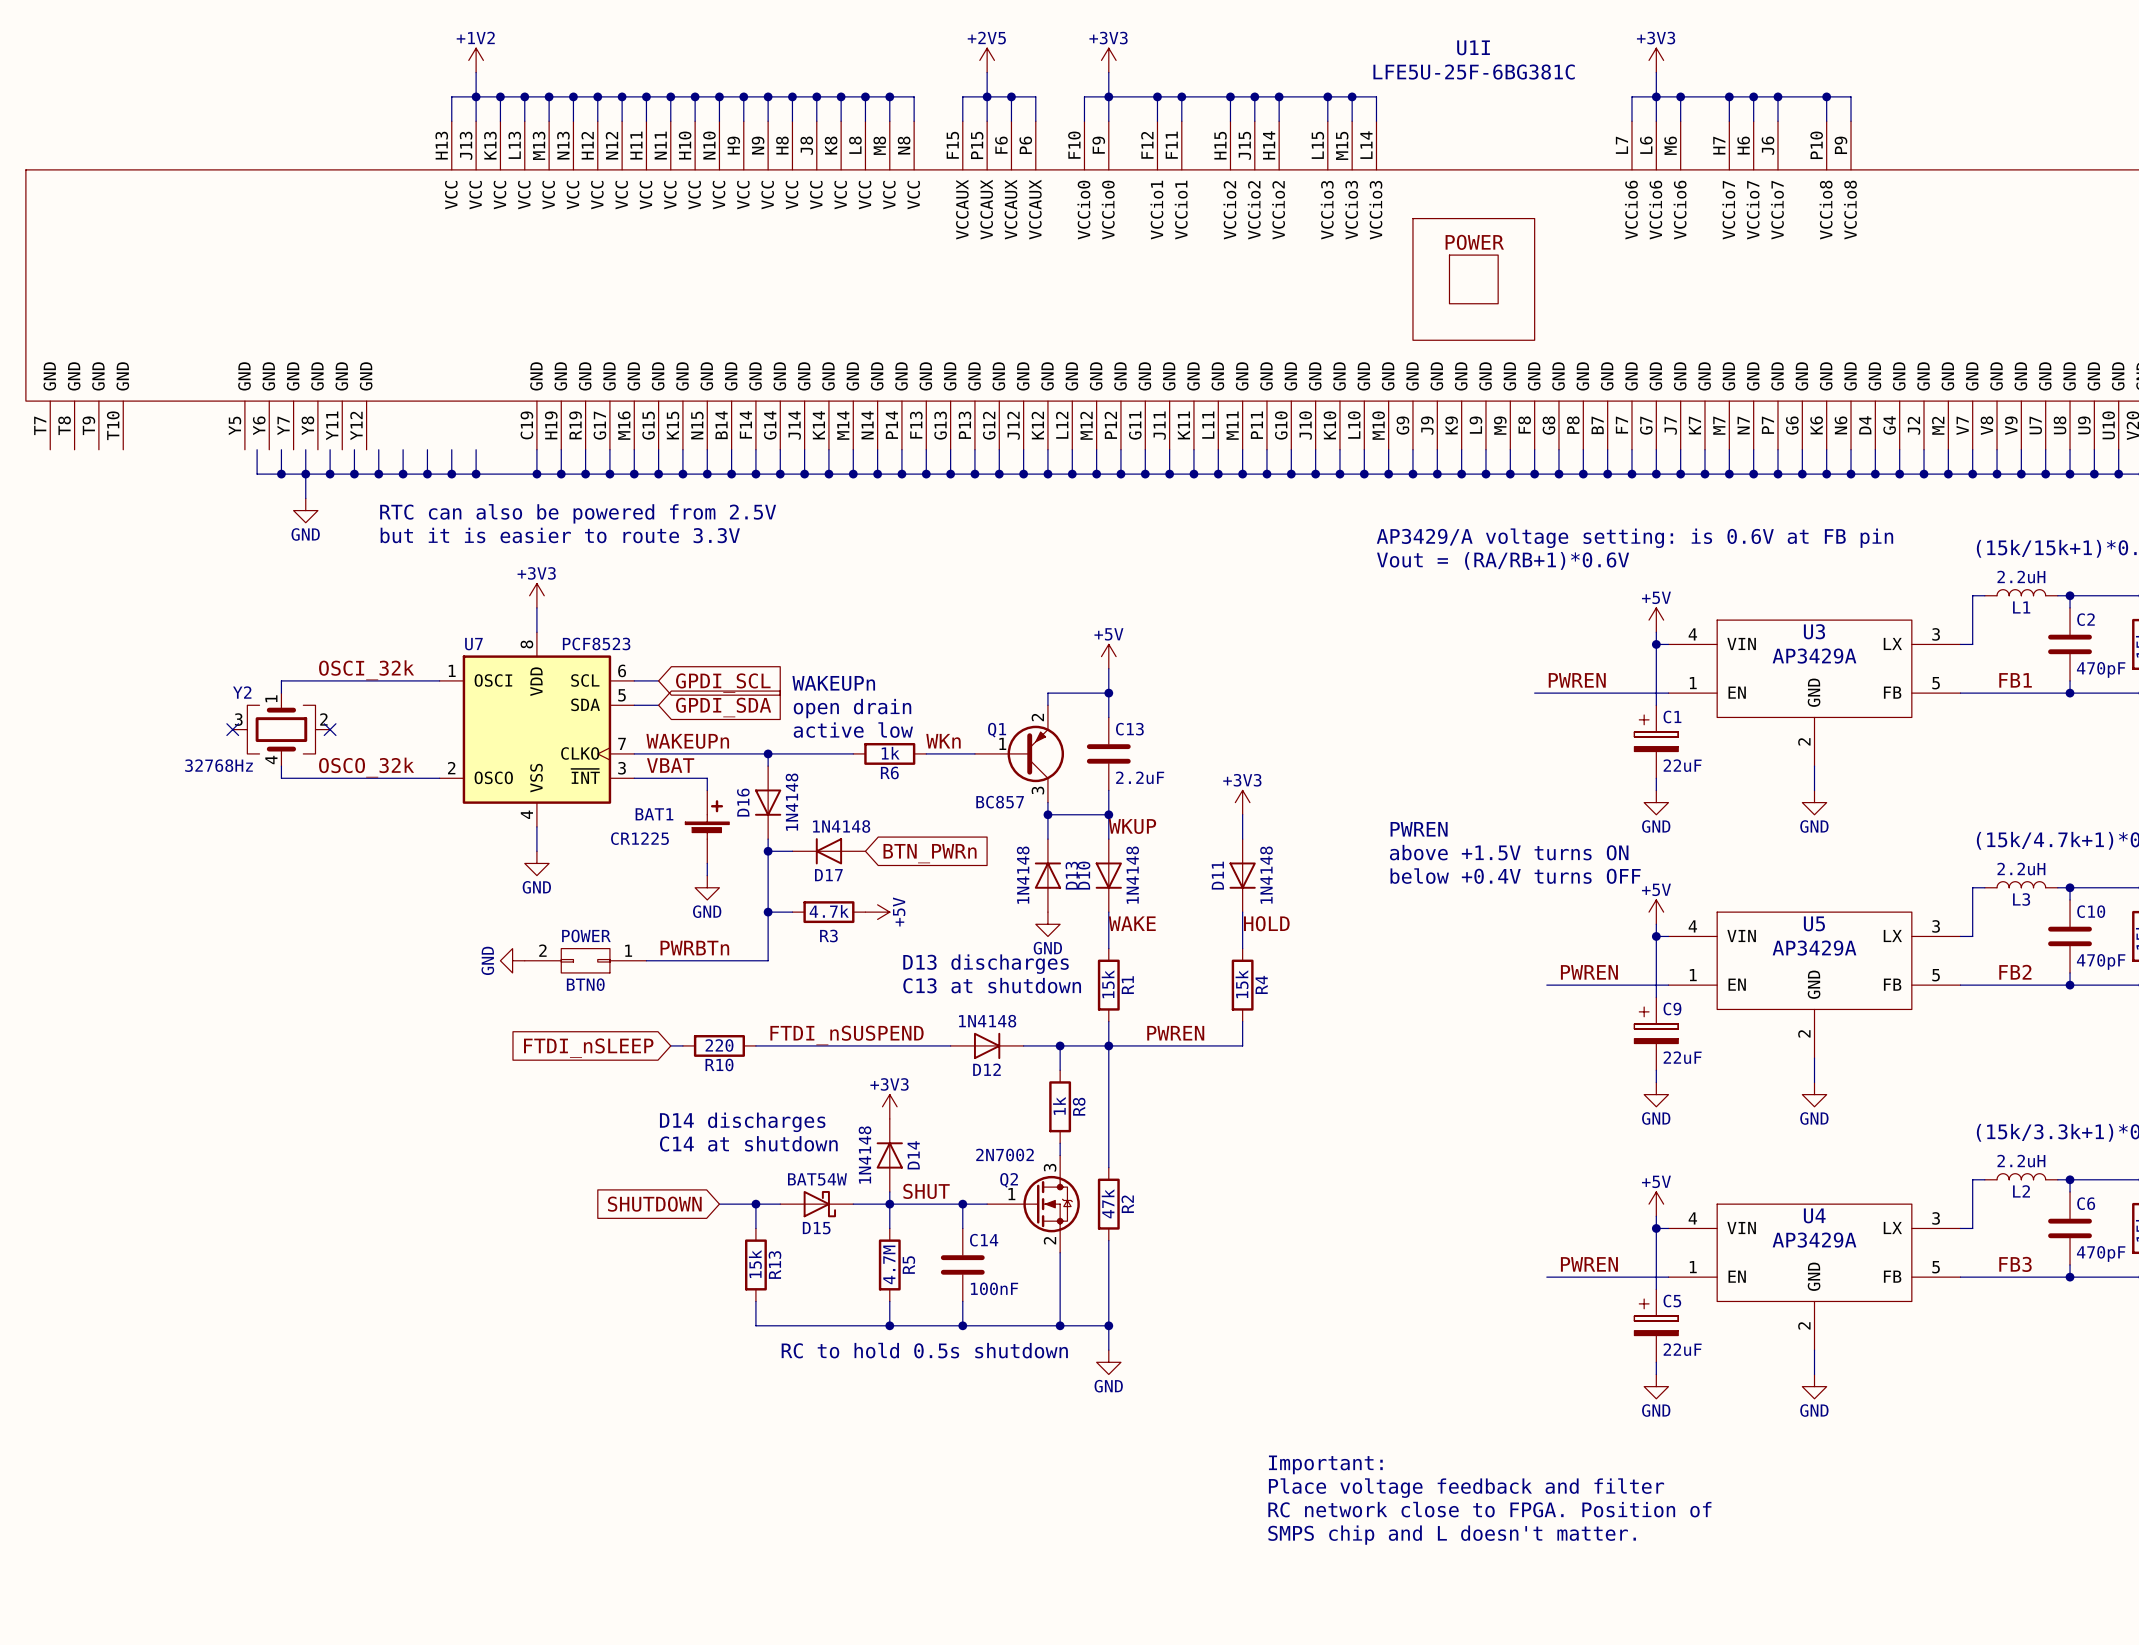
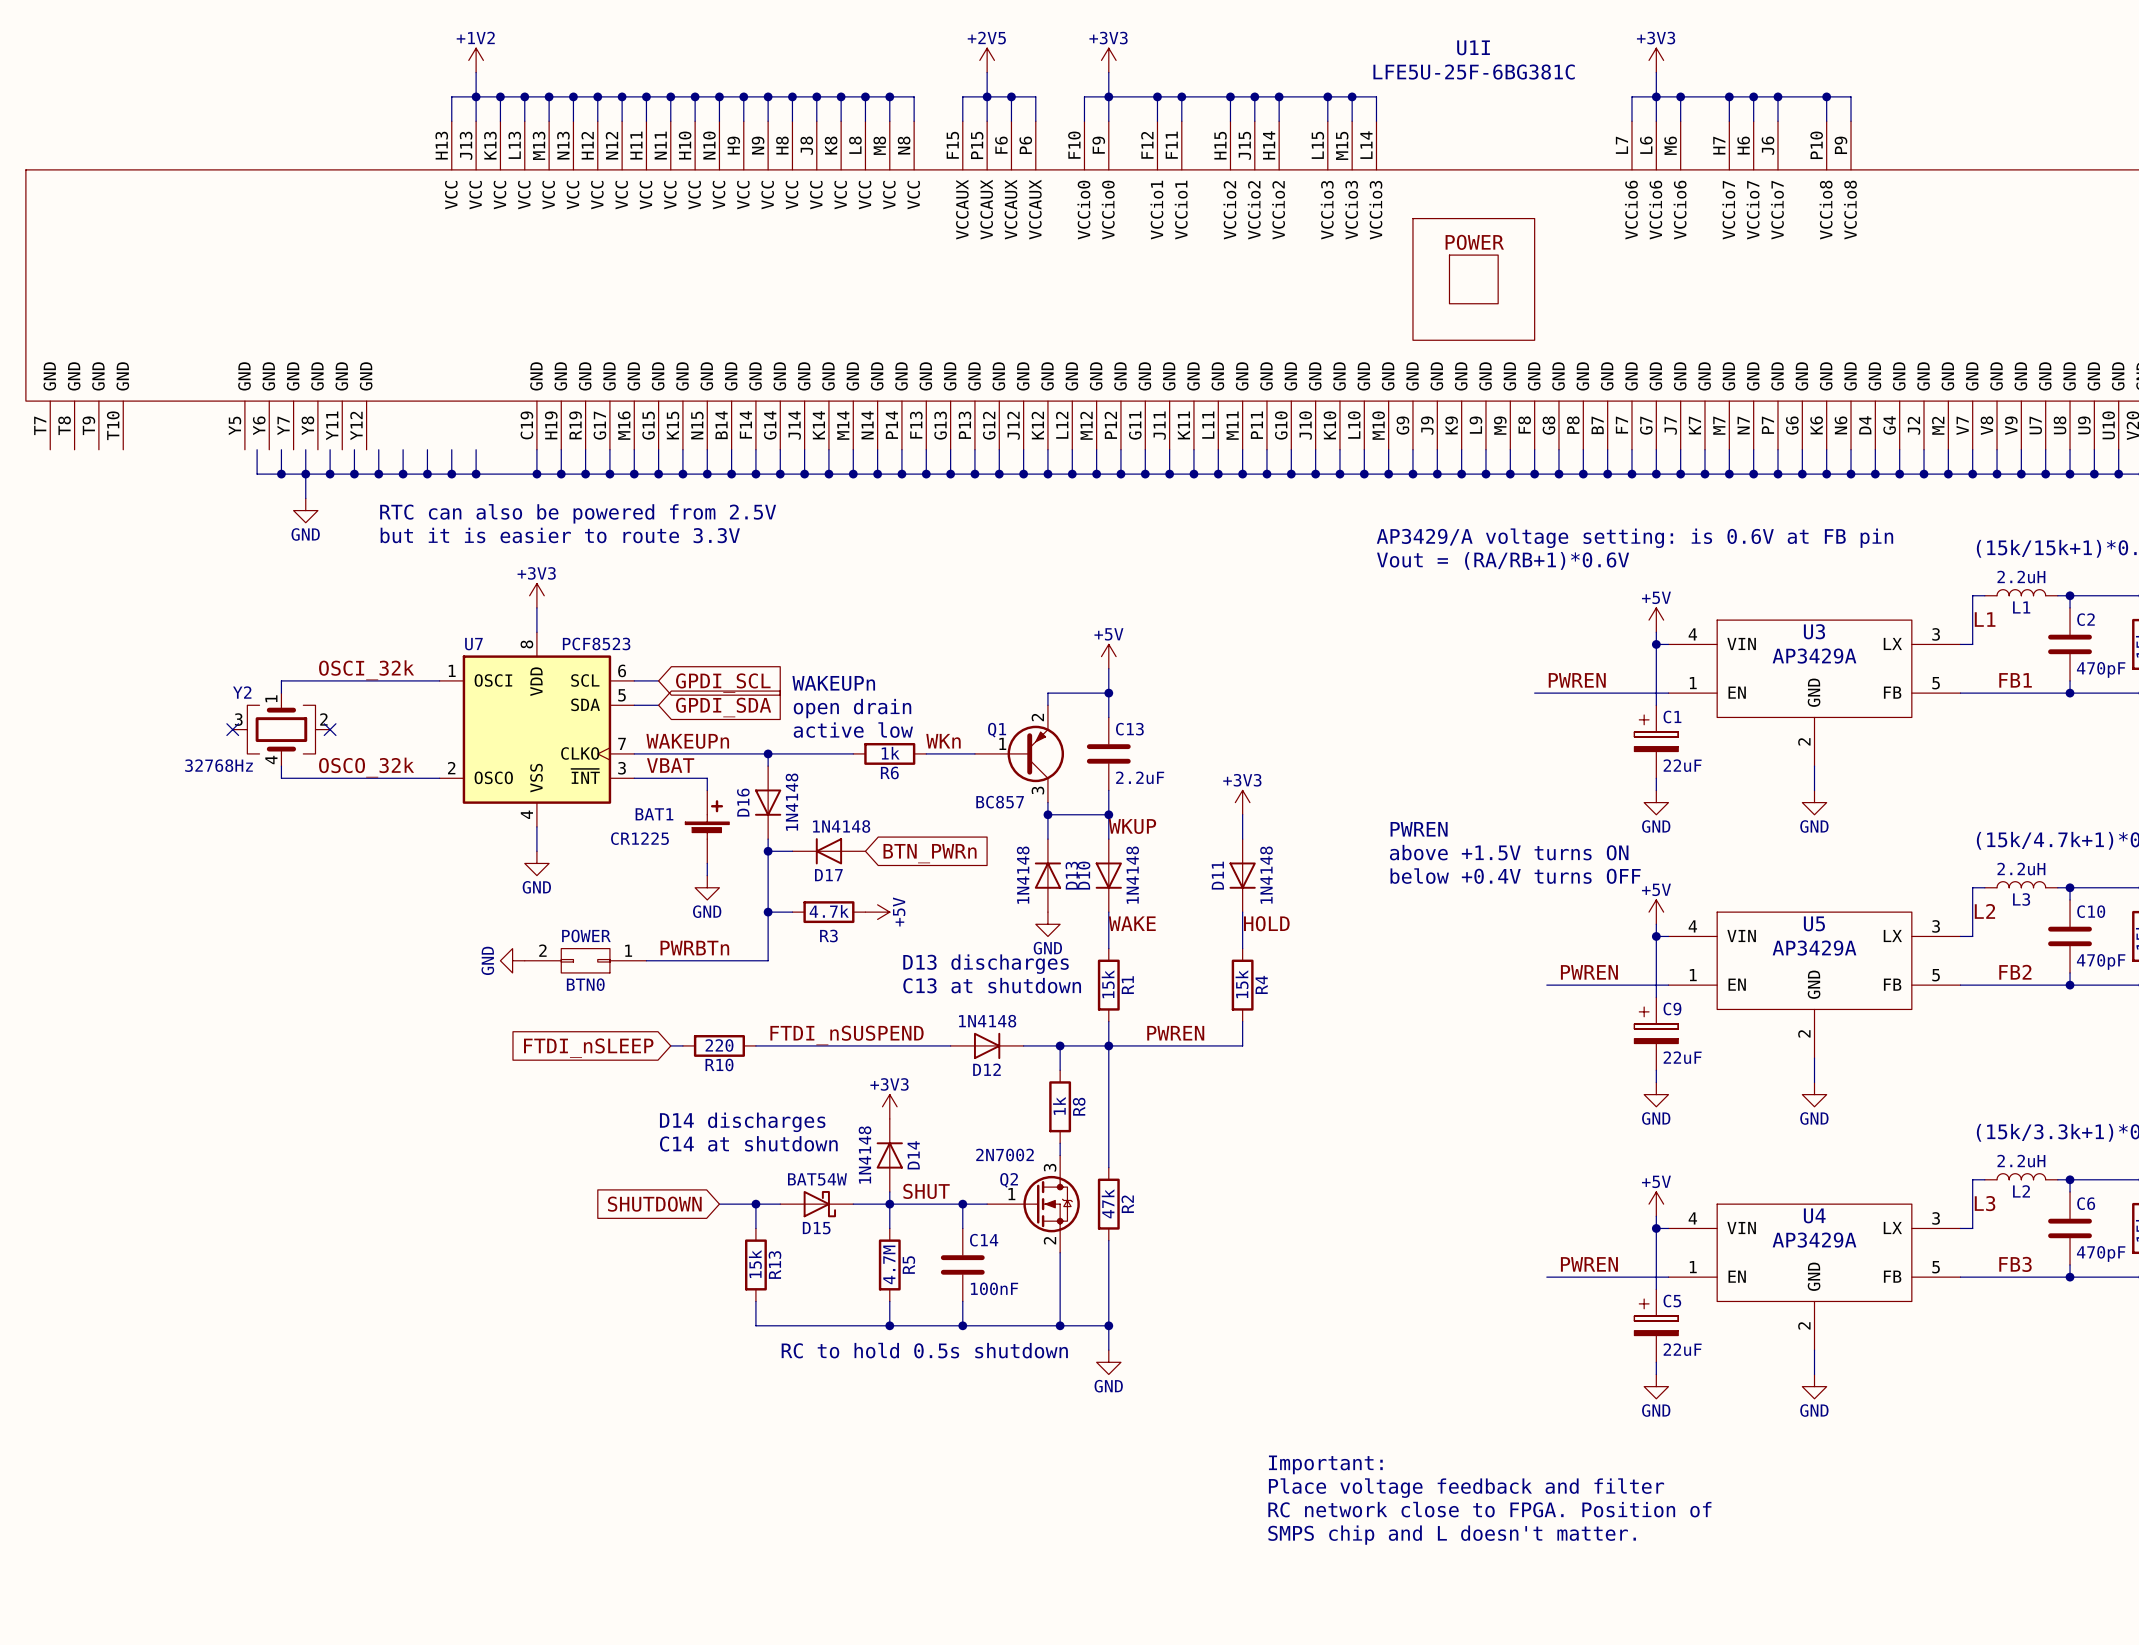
label: none -> L1 (1985, 619)
label: none -> L2 (1984, 911)
label: none -> L3 (1985, 1203)

